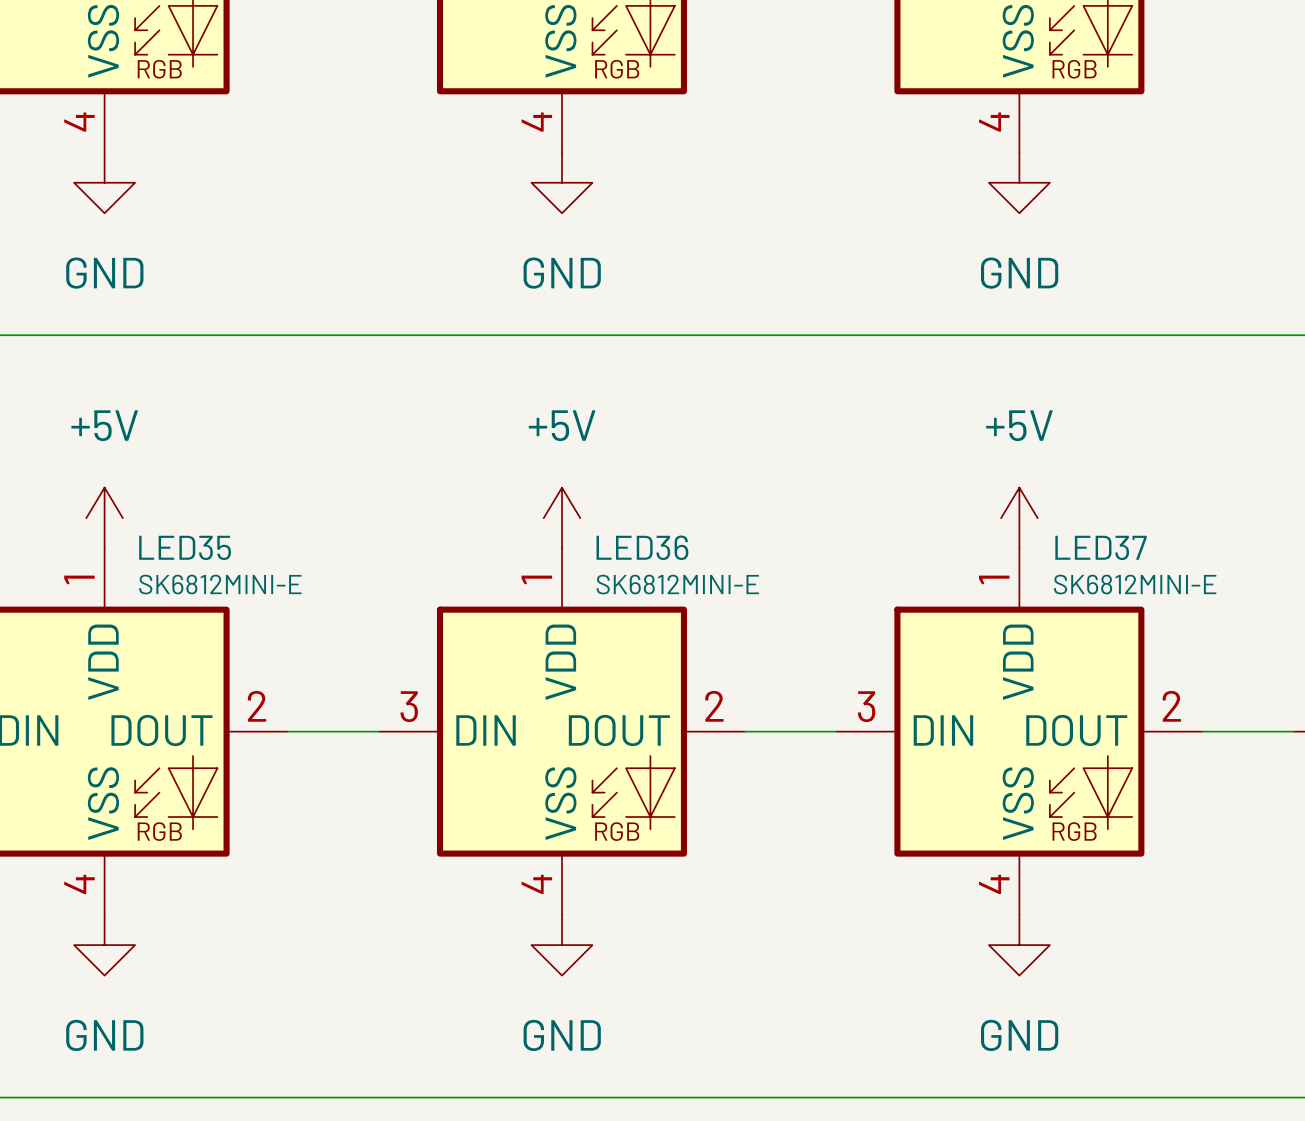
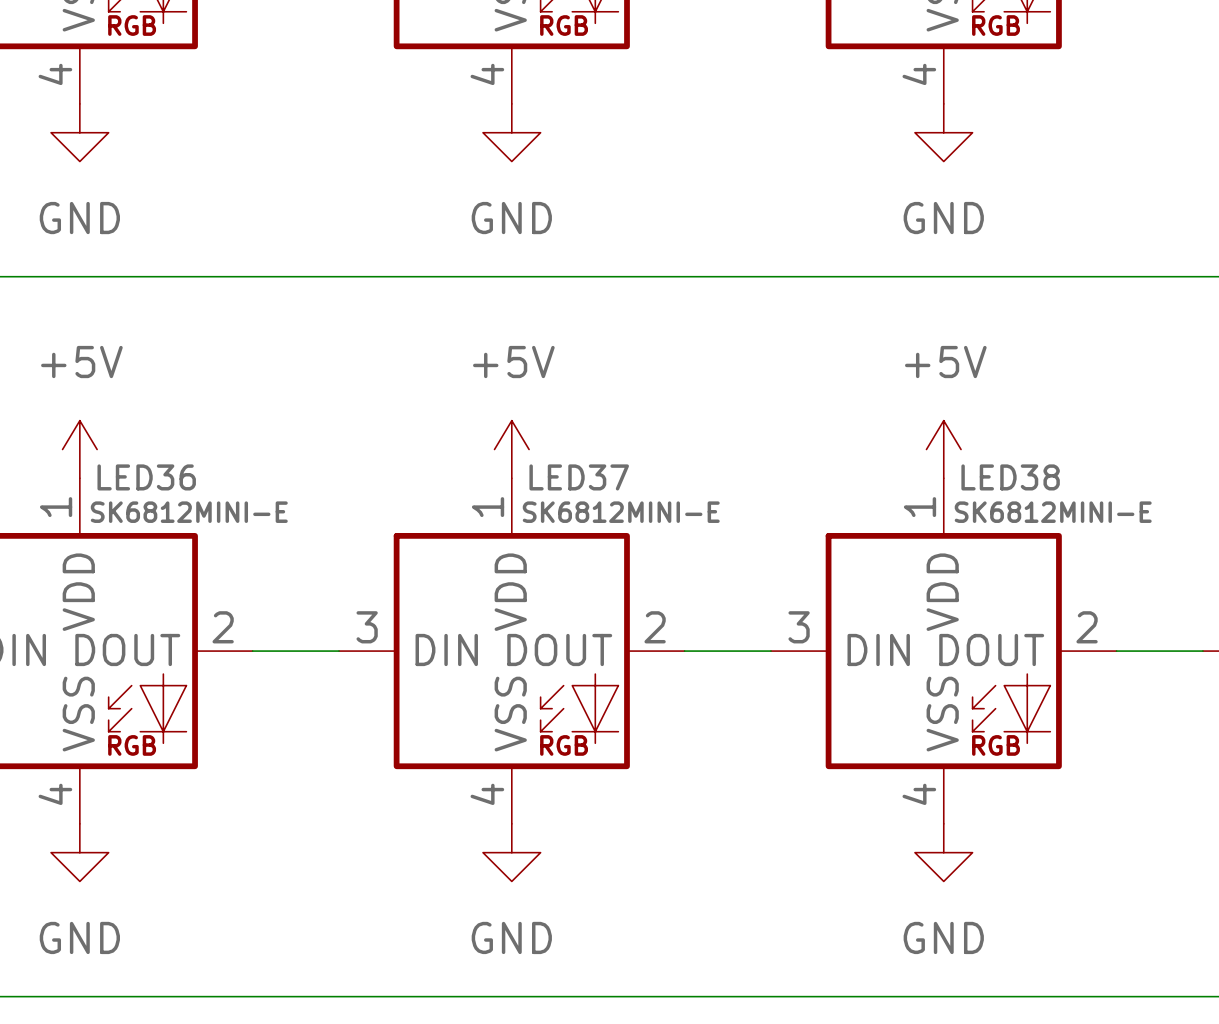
LED35 name: LED35 (185, 547) -> LED36 (146, 477)
LED36 name: LED36 (642, 547) -> LED37 (579, 477)
LED37 name: LED37 (1101, 547) -> LED38 (1010, 477)

